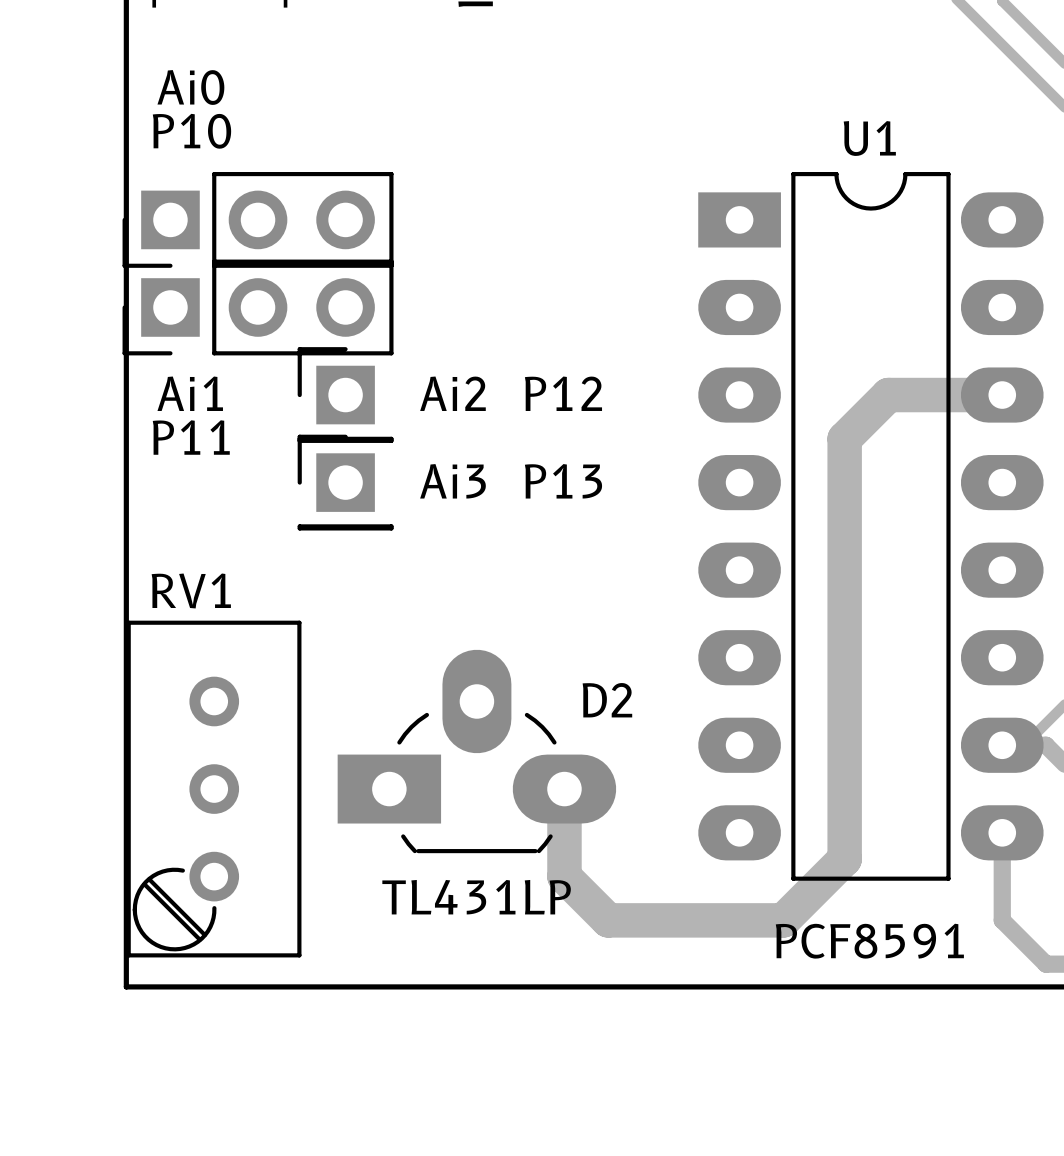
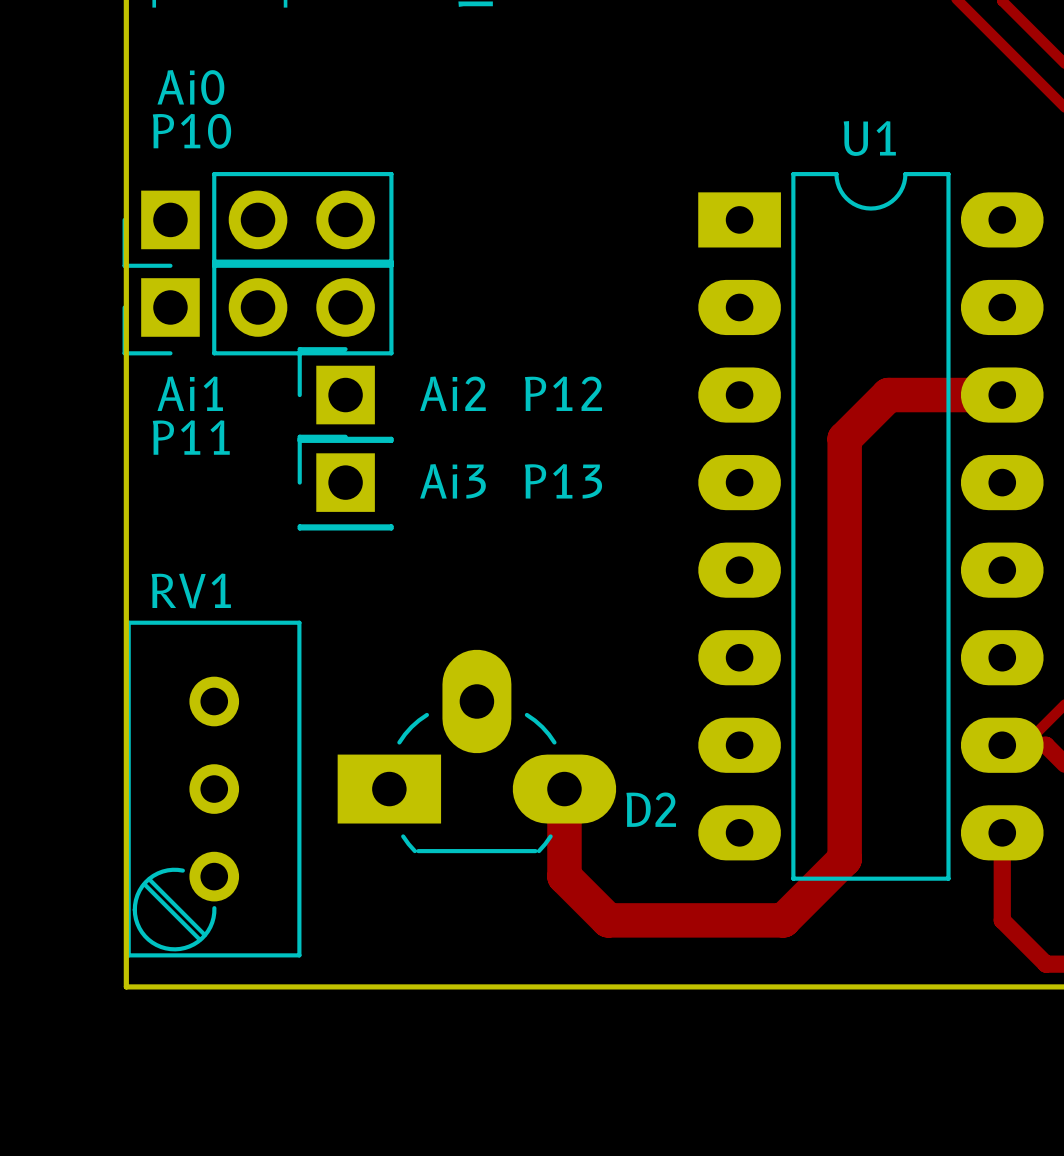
D2 name position: D2 (607, 700) -> D2 (651, 809)
D2 value: TL431LP (476, 897) -> none
U1 value: PCF8591 (869, 941) -> none

